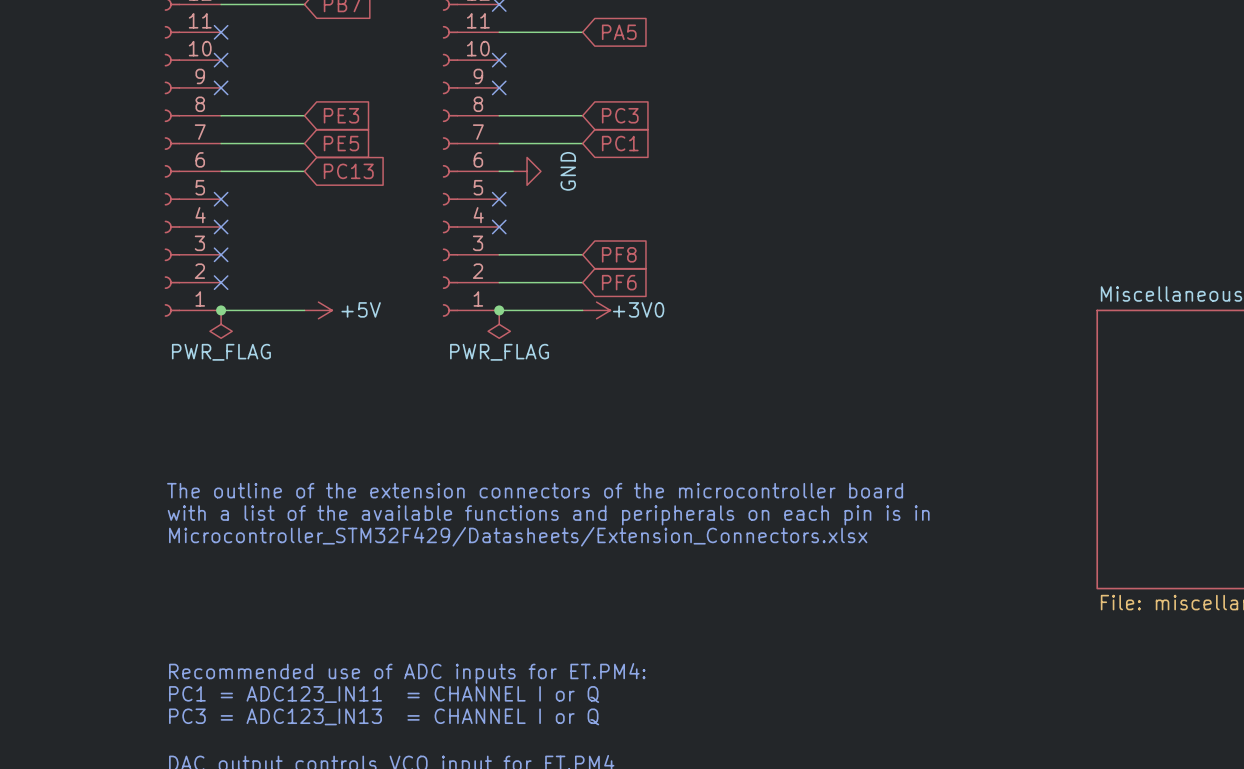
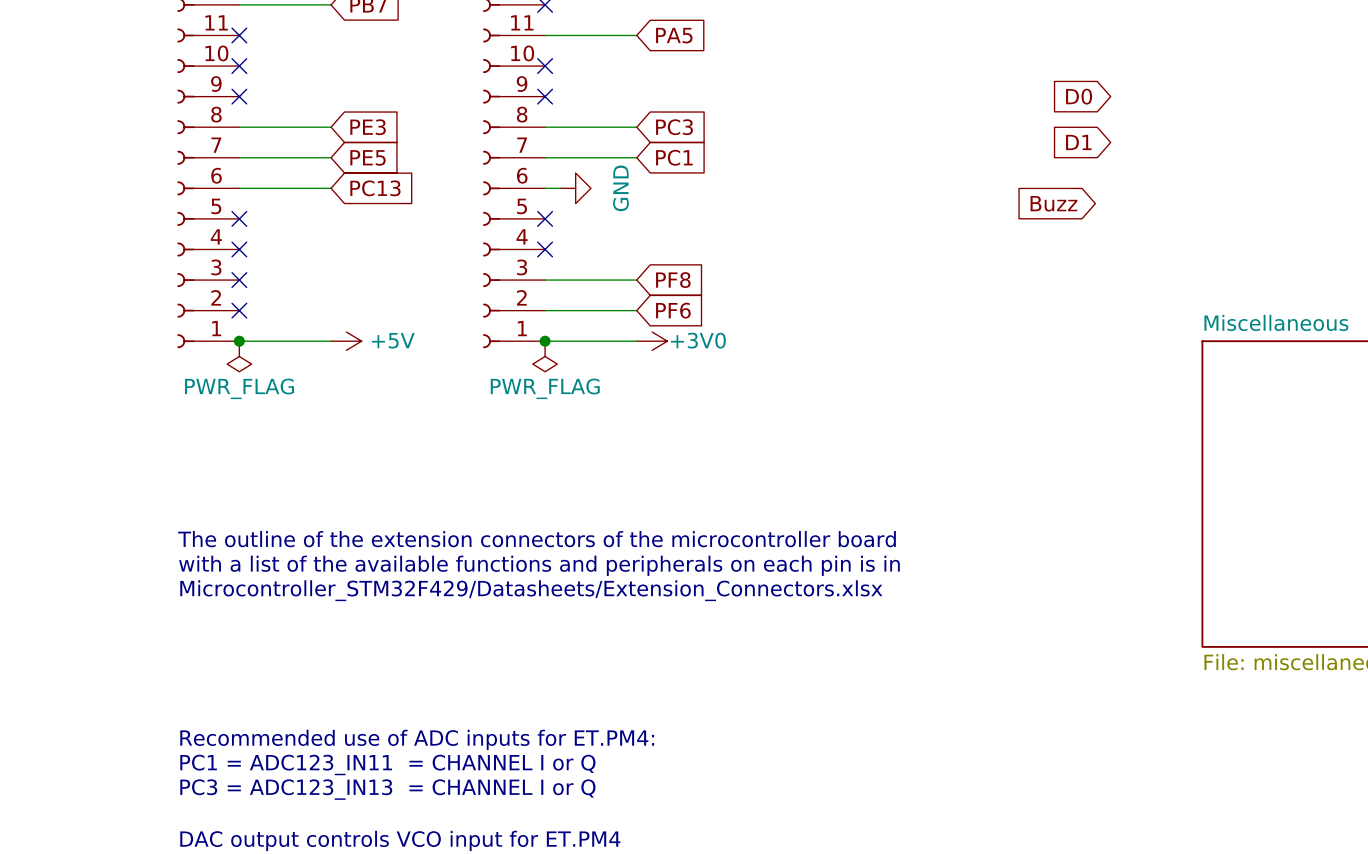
global label: none -> D0 (1079, 96)
global label: none -> D1 (1078, 142)
global label: none -> Buzz (1053, 203)

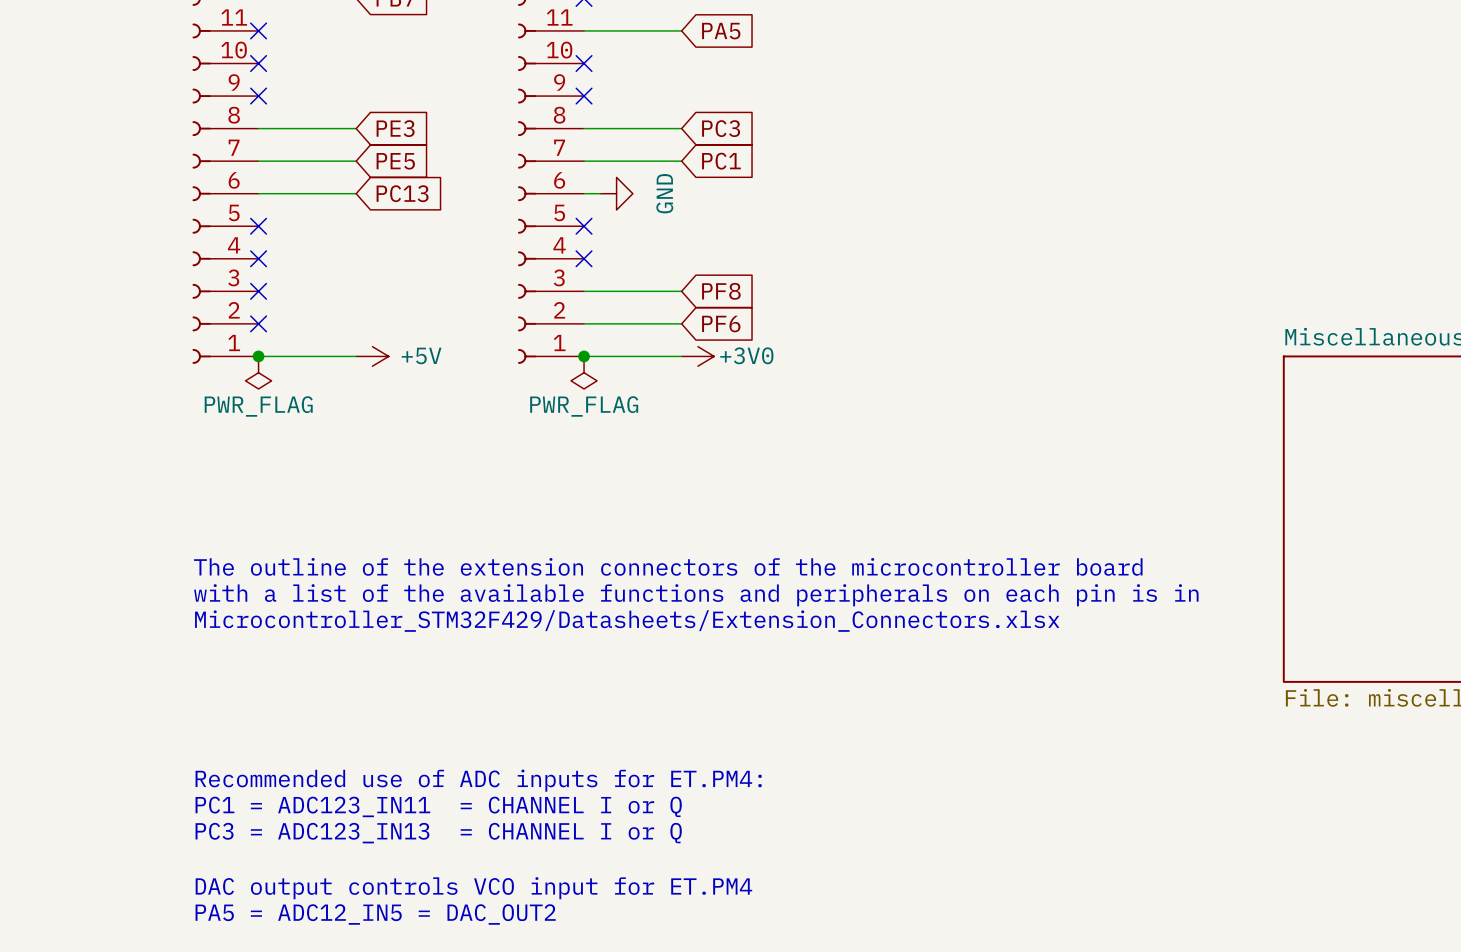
global label: D0 (1079, 96) -> none
global label: D1 (1078, 142) -> none
global label: Buzz (1053, 203) -> none

